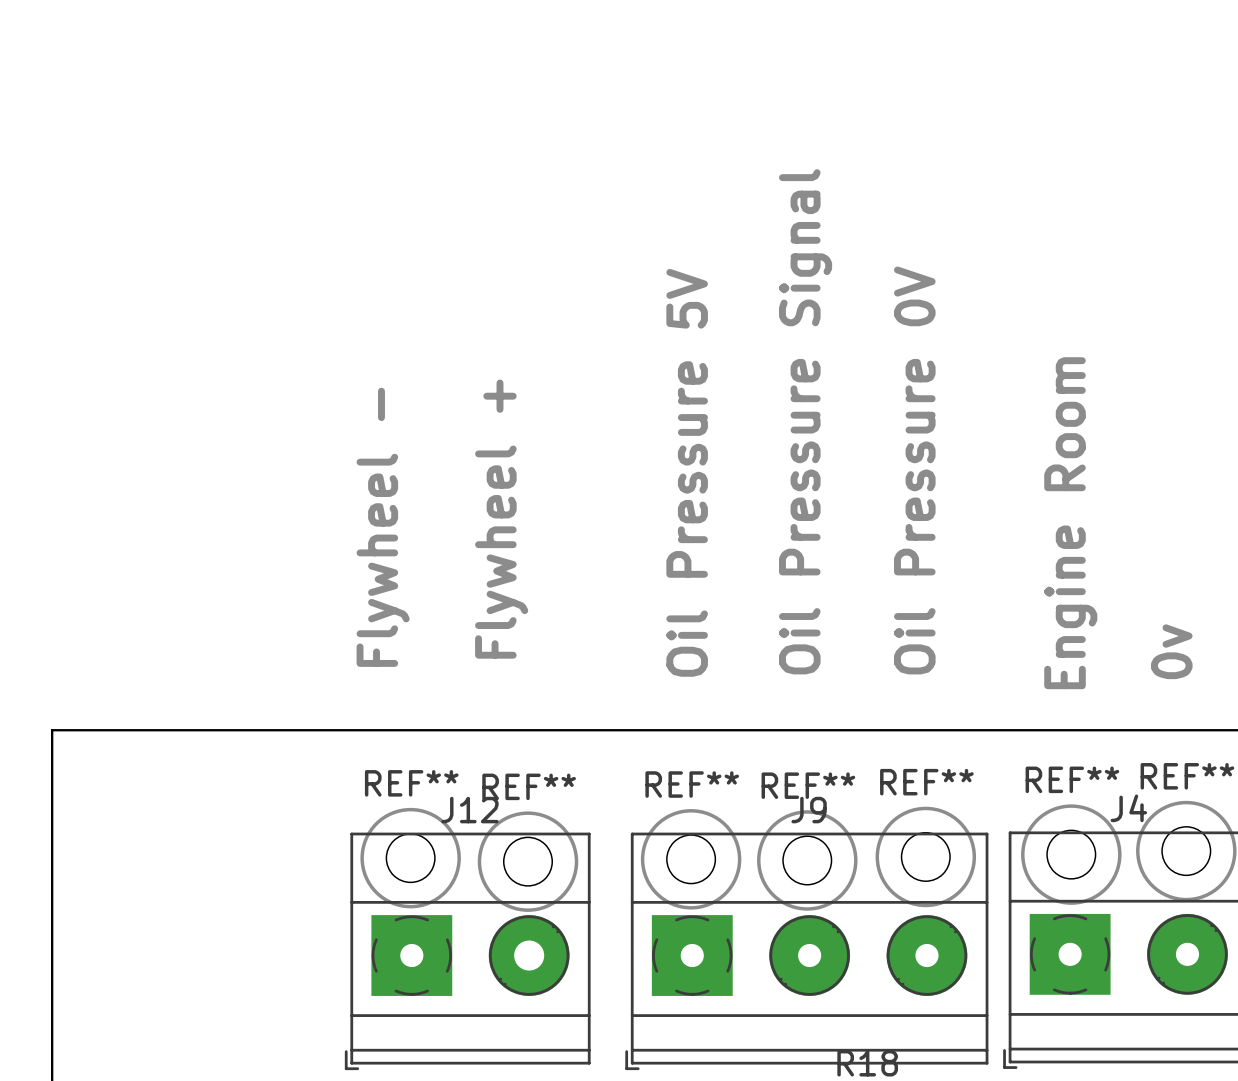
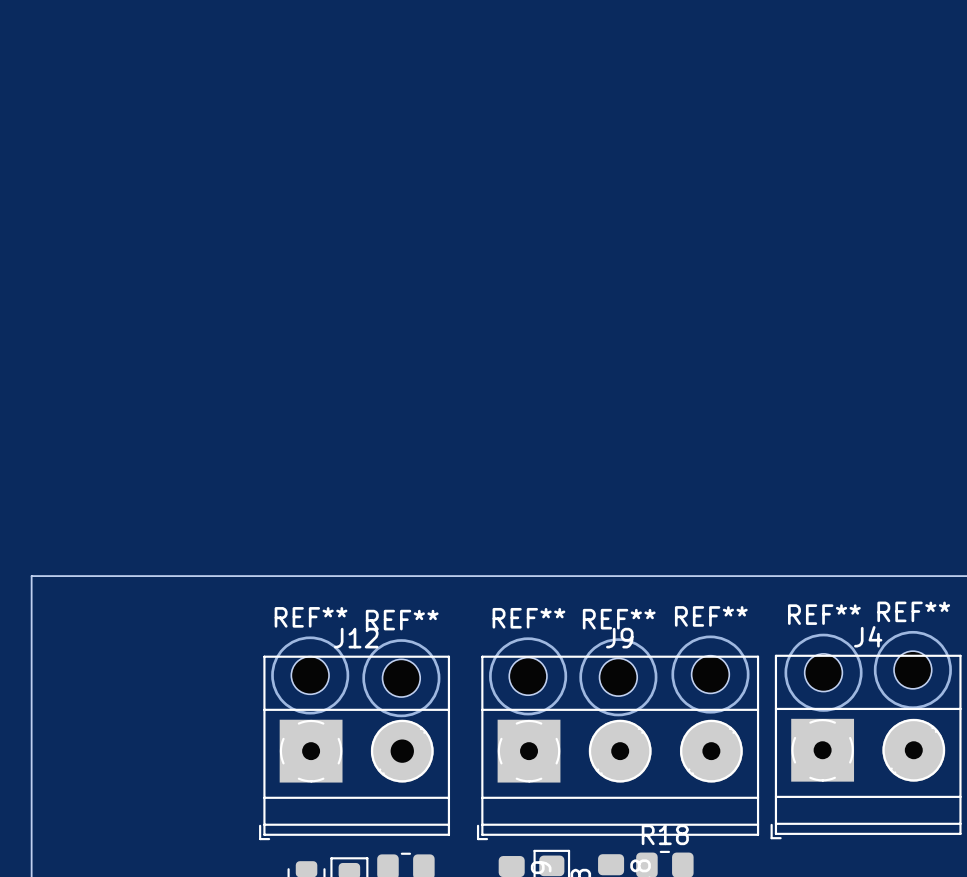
text: Oil Pressure Signal (805, 421) -> none
text: Oil Pressure 0V (914, 470) -> none
text: Oil Pressure 5V (687, 472) -> none
text: Flywheel + (501, 519) -> none
text: Engine Room (1070, 523) -> none
text: Flywheel - (383, 527) -> none
text: 0v (1171, 651) -> none

